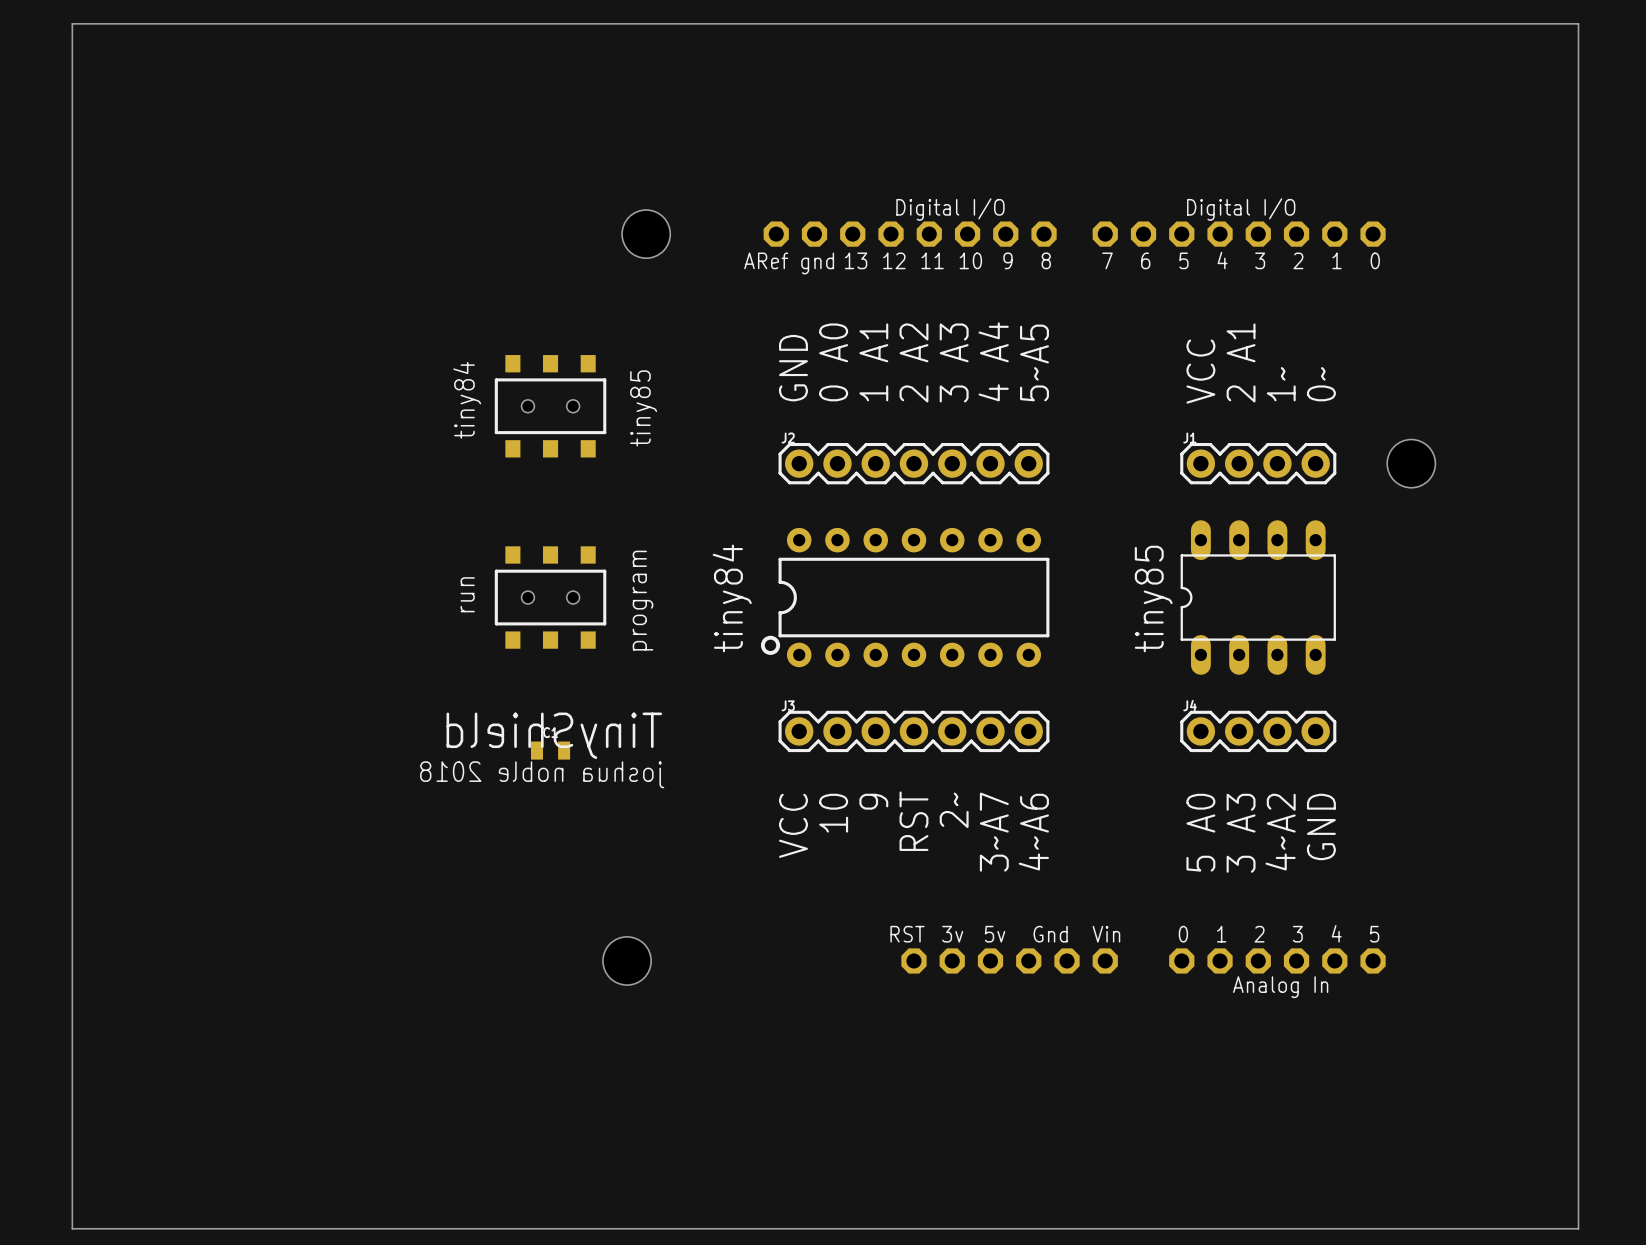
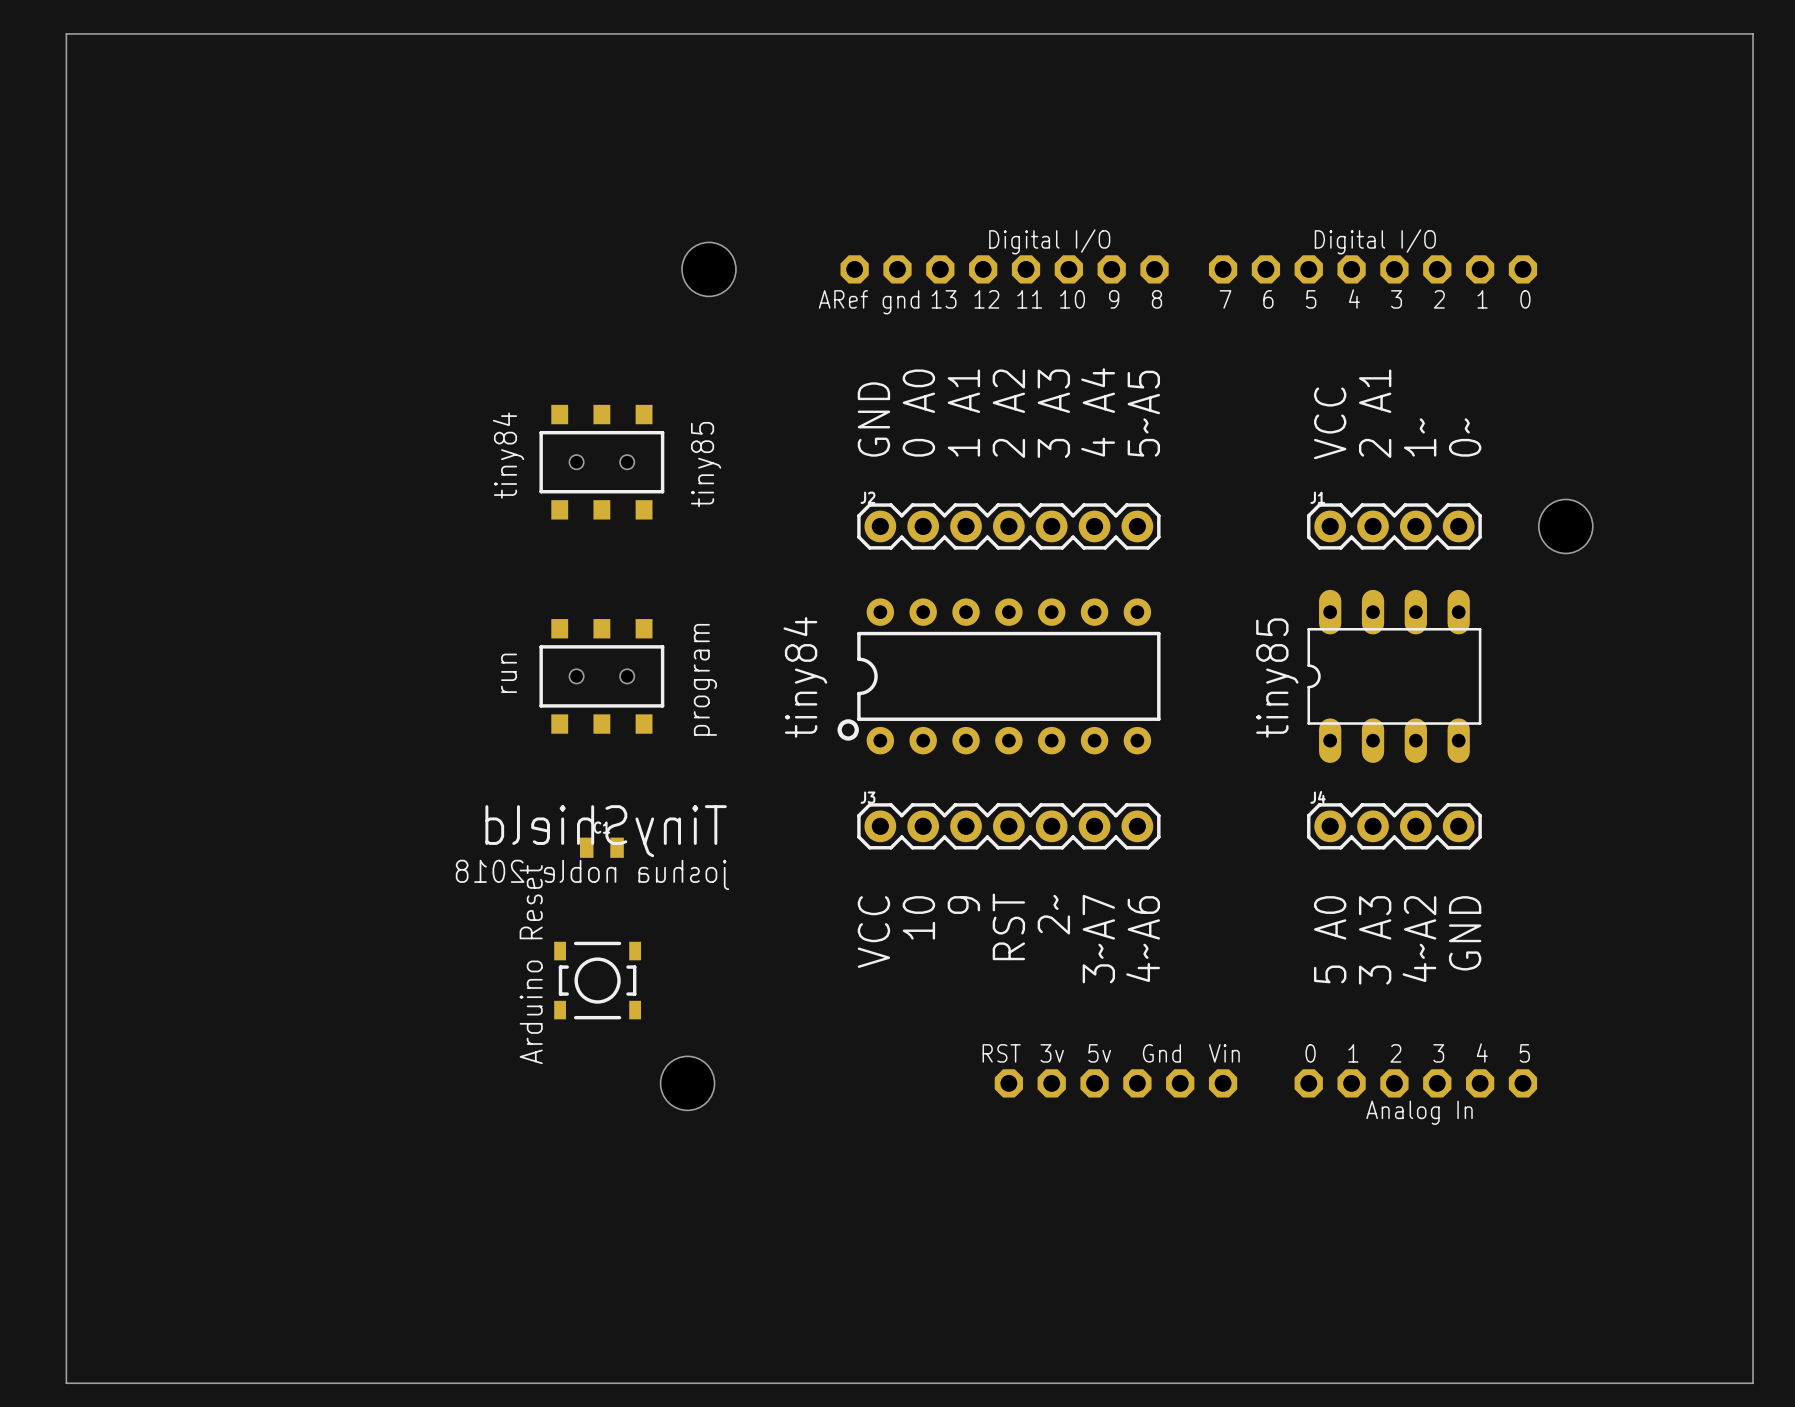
text: none -> Arduino Reset (531, 964)
part: none -> (597, 980)

